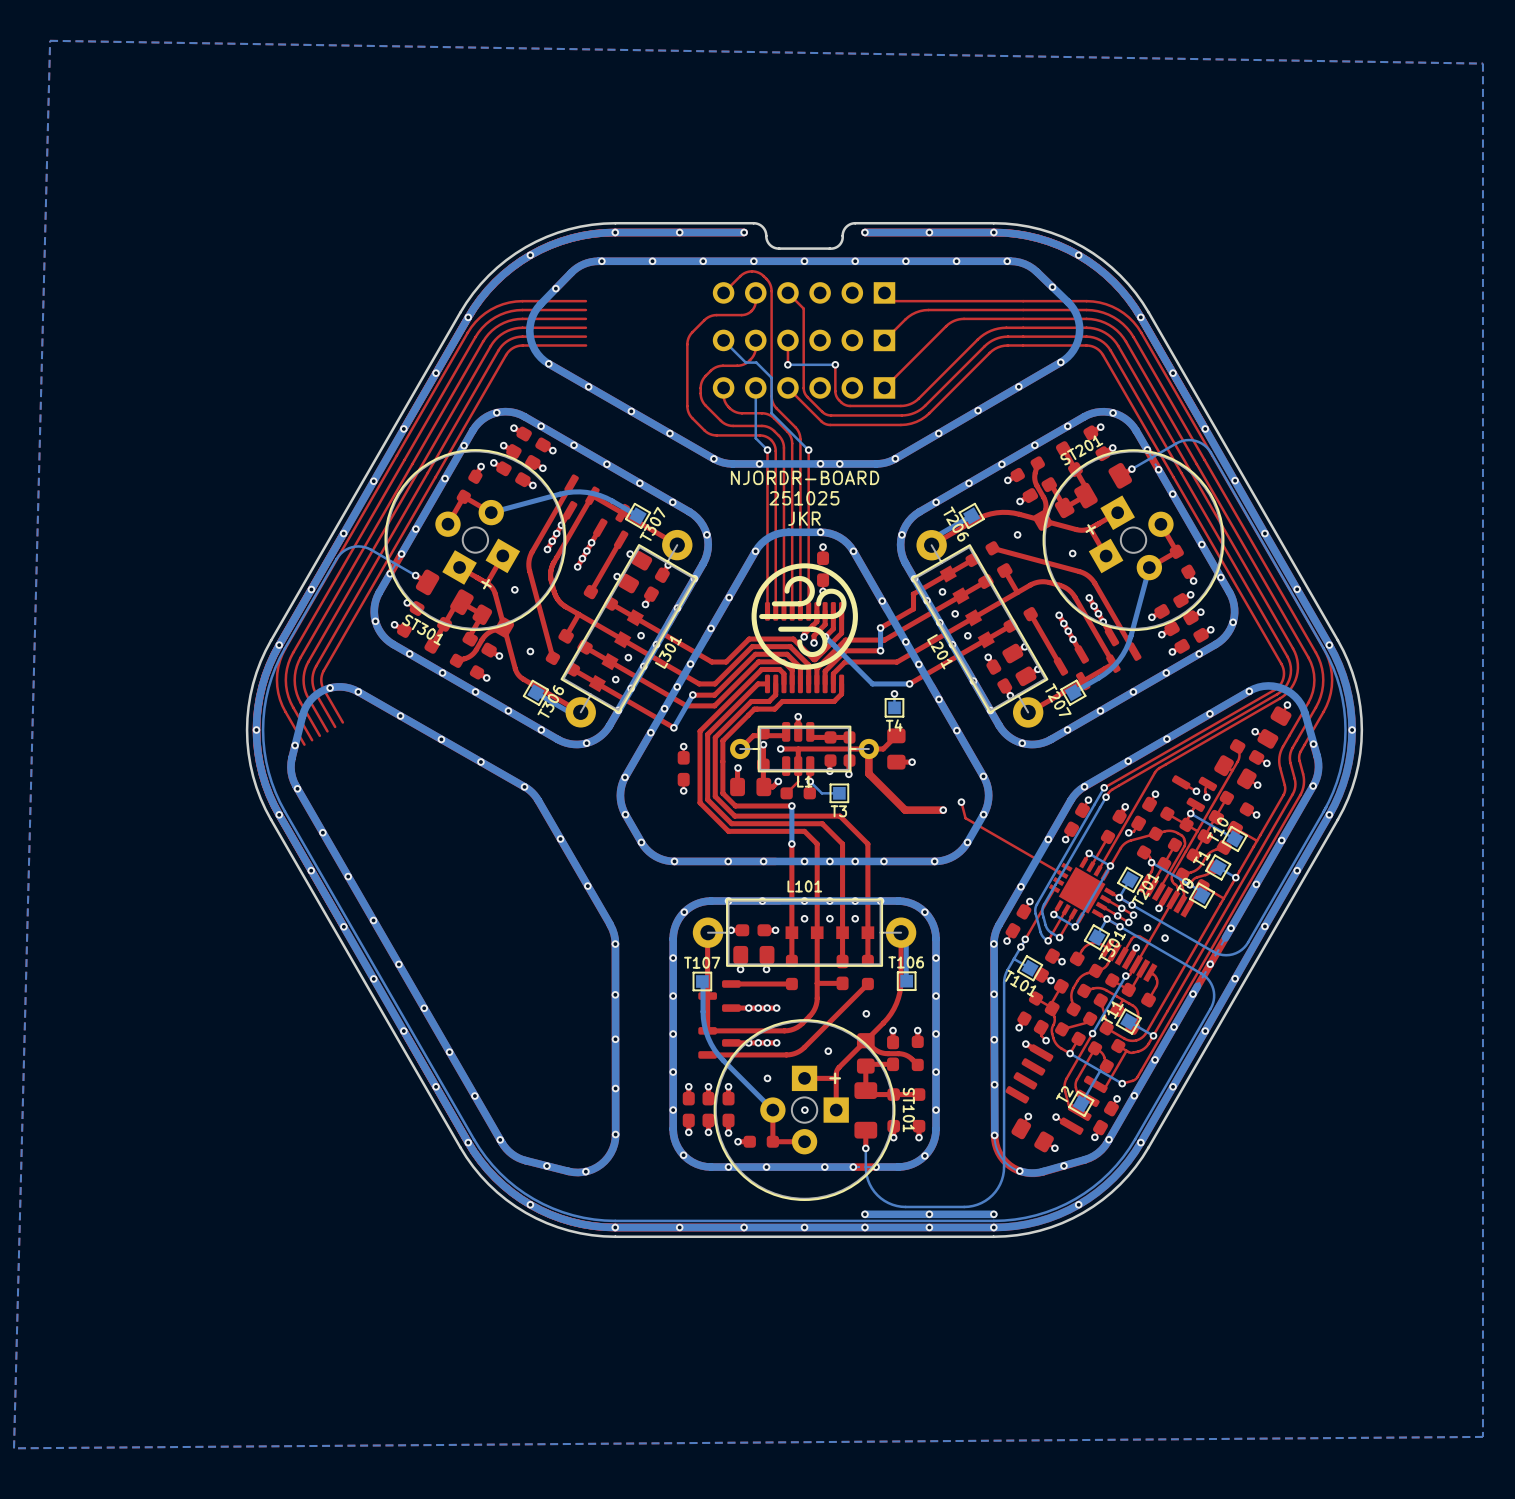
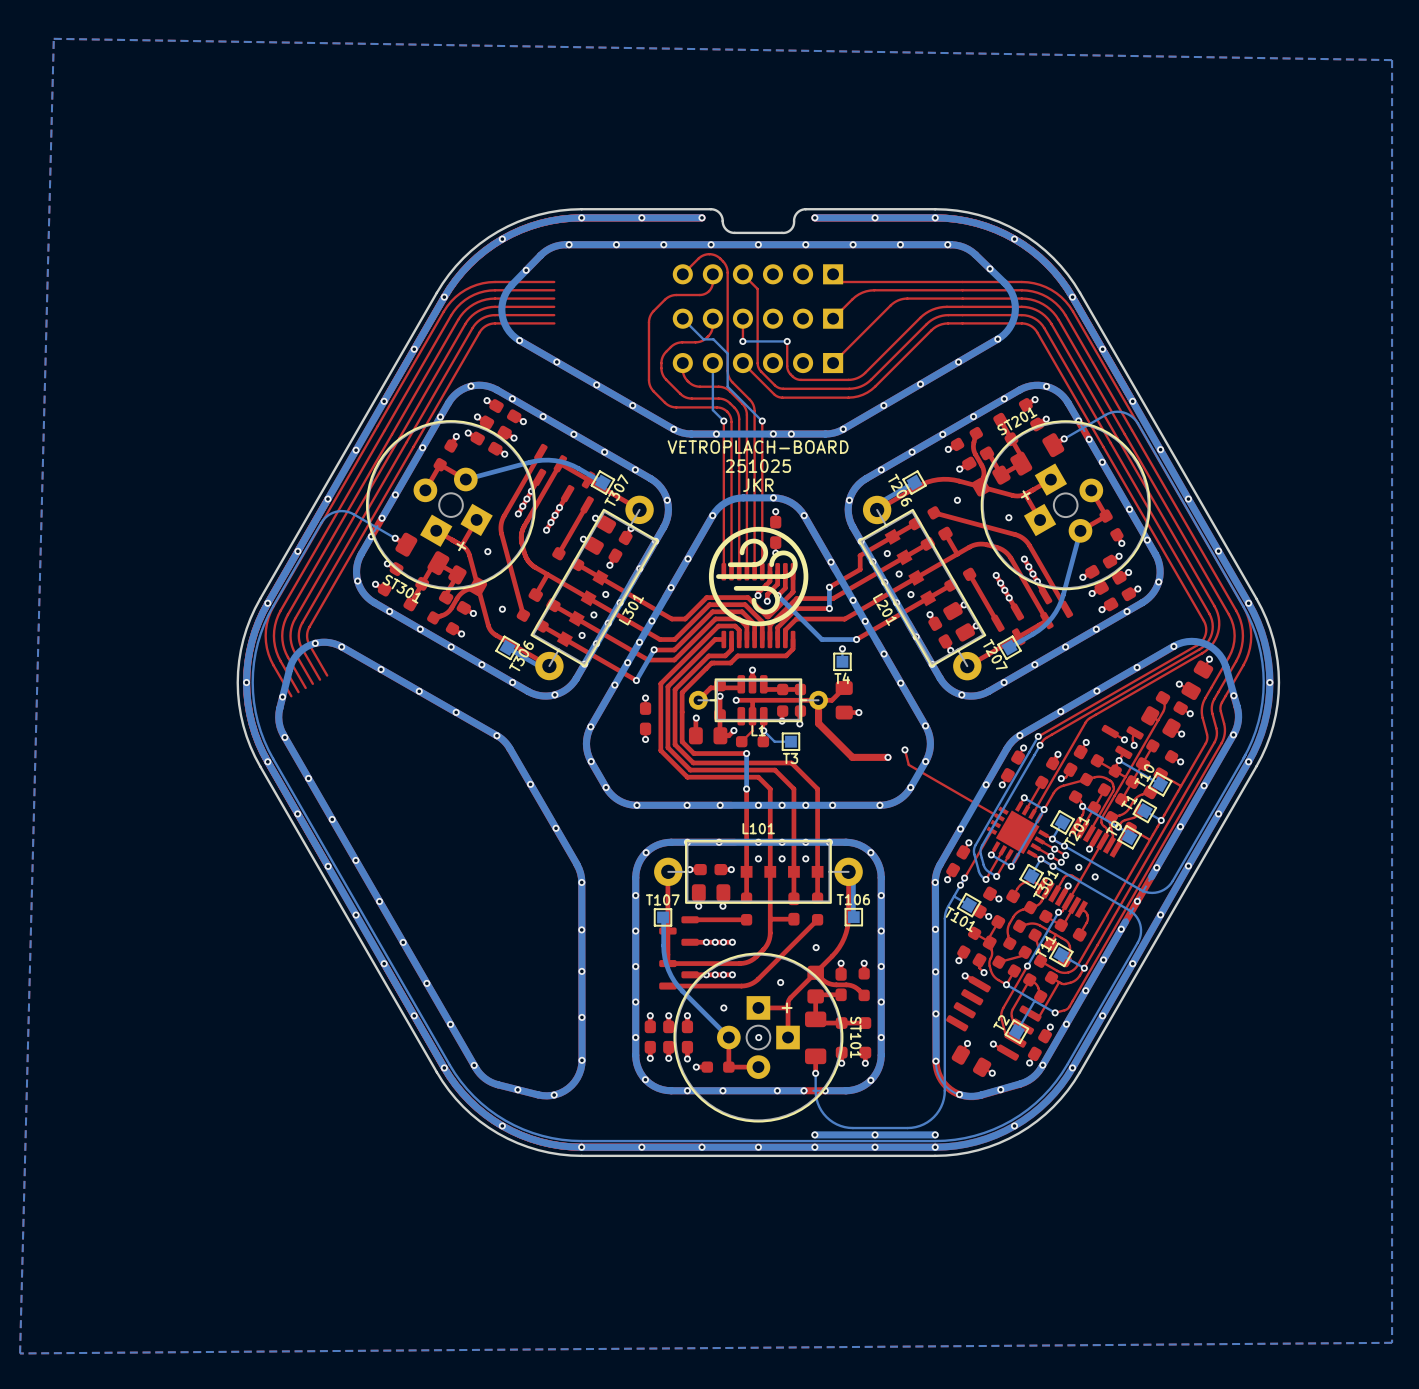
text: NJORDR-BOARD (805, 477) -> VETROPLACH-BOARD (758, 447)

